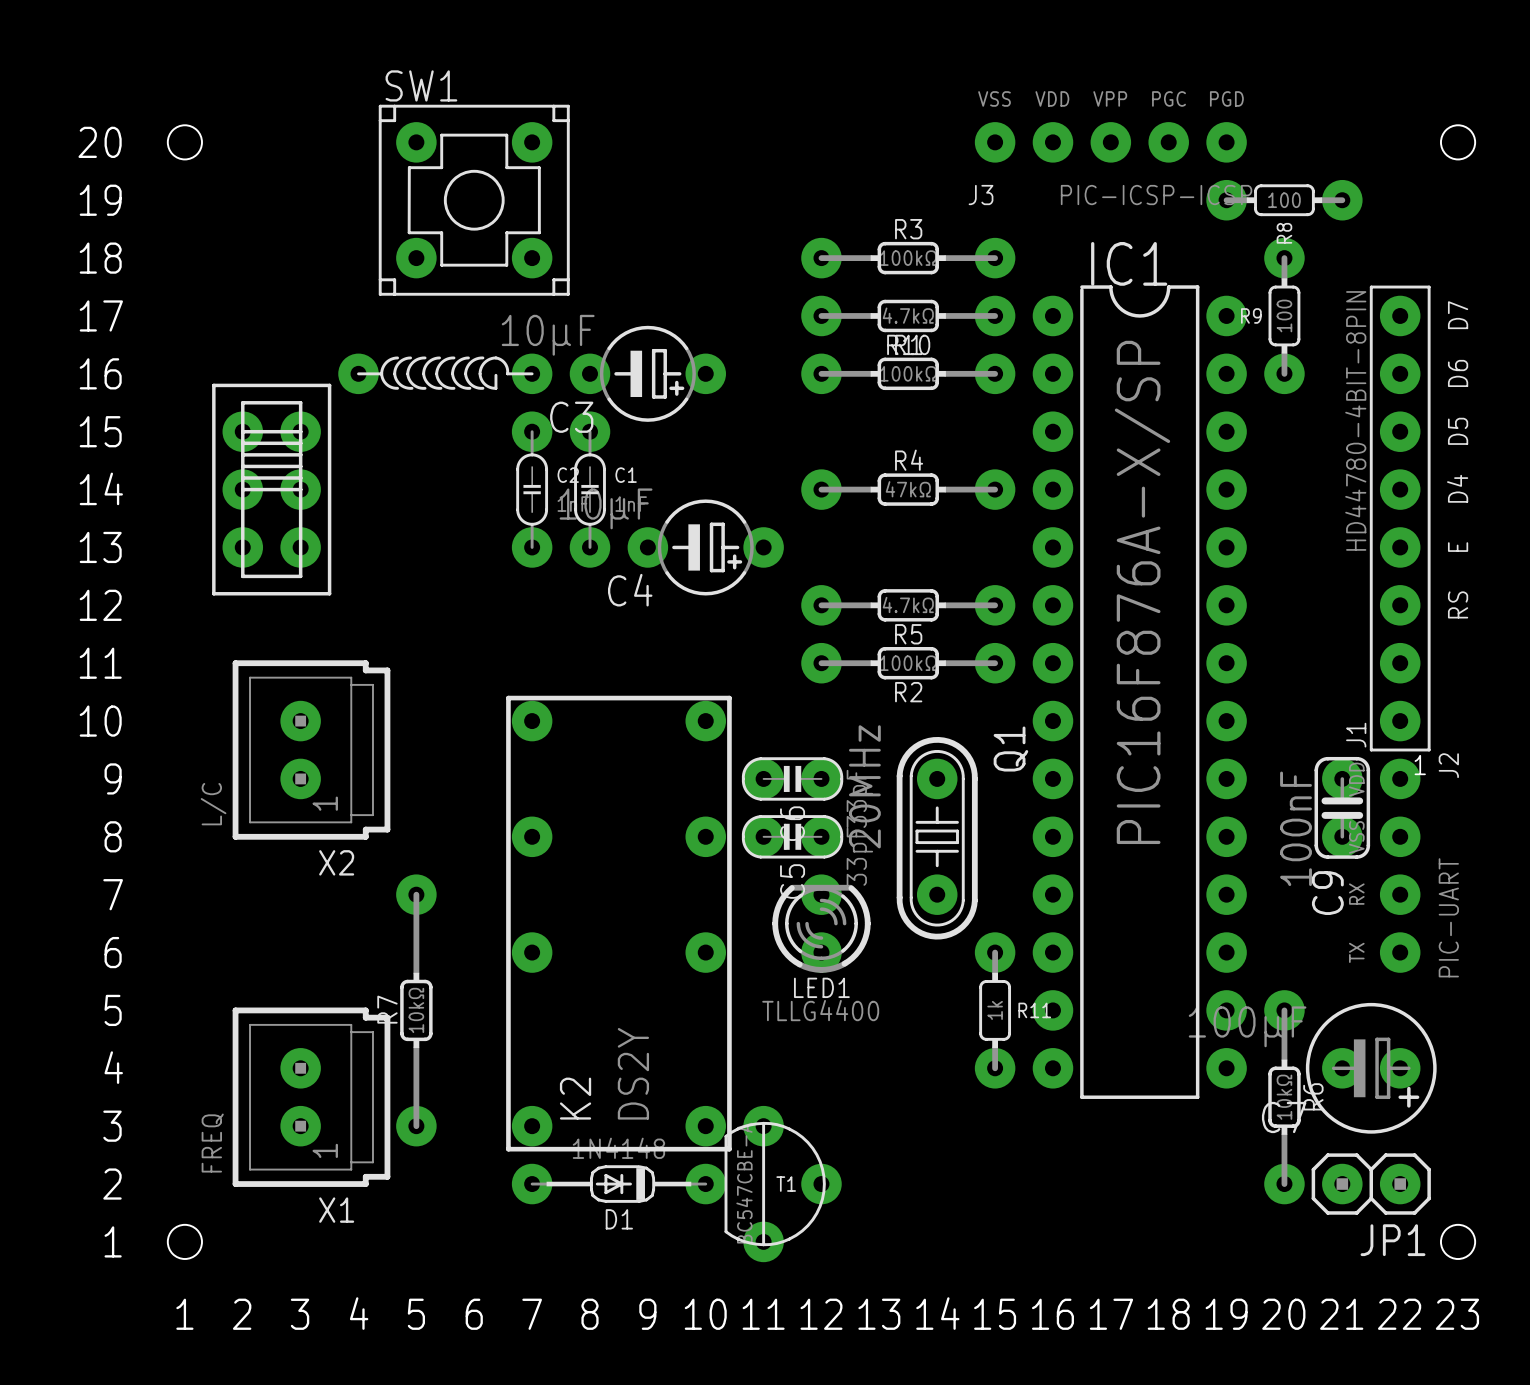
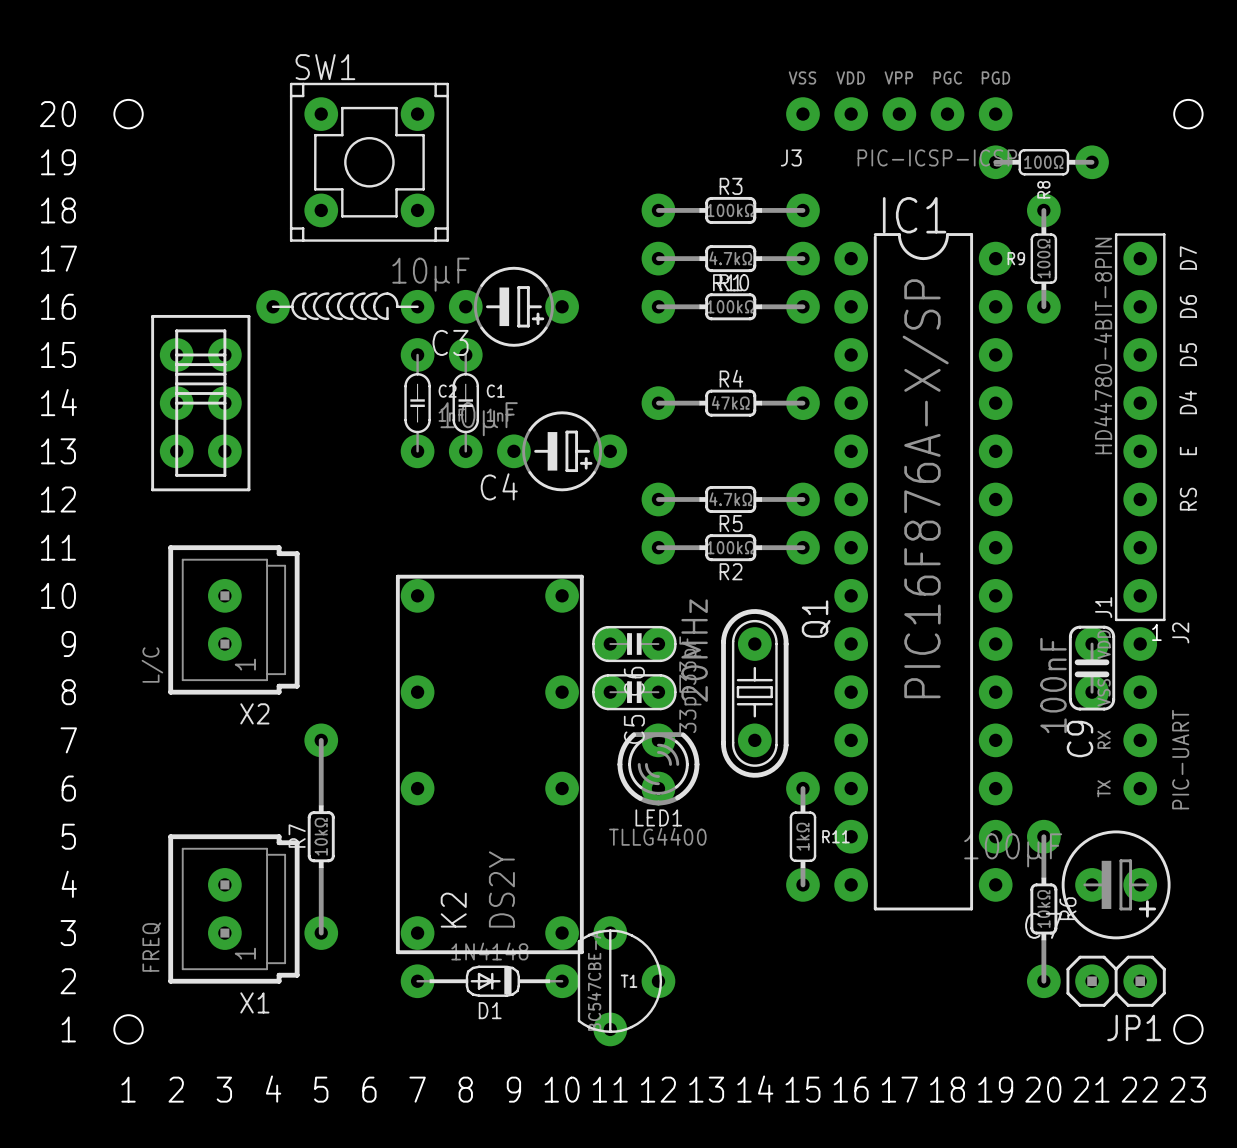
R8 value: 100 (1284, 200) -> 100Ω (1043, 162)
R9 value: 100 (1284, 315) -> 100Ω (1043, 258)
R11 value: 1k (995, 1010) -> 1kΩ (802, 836)

